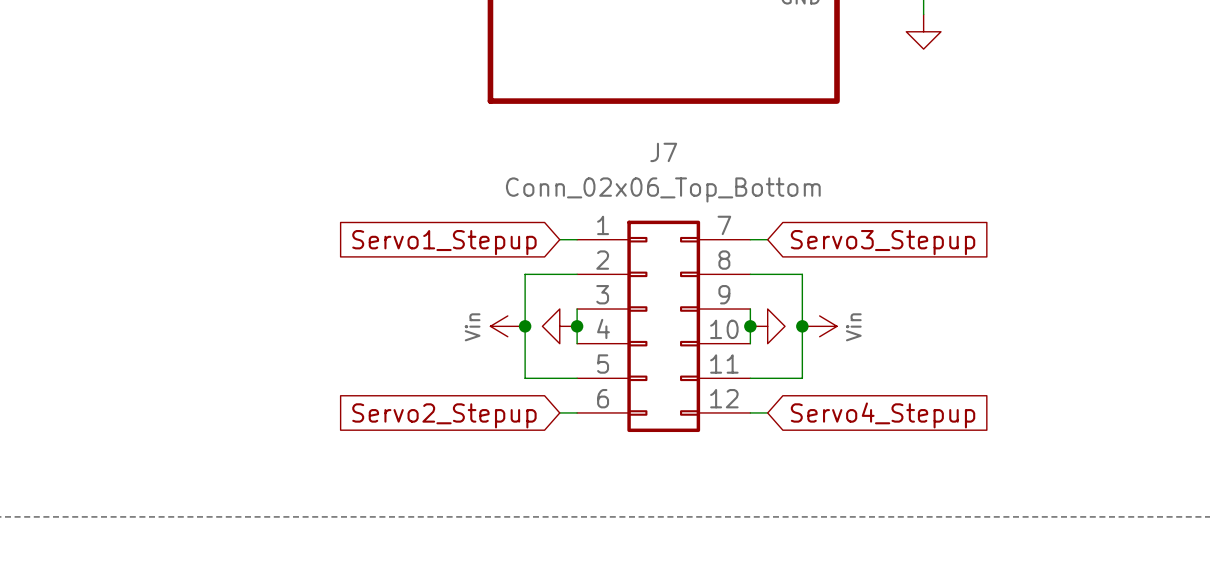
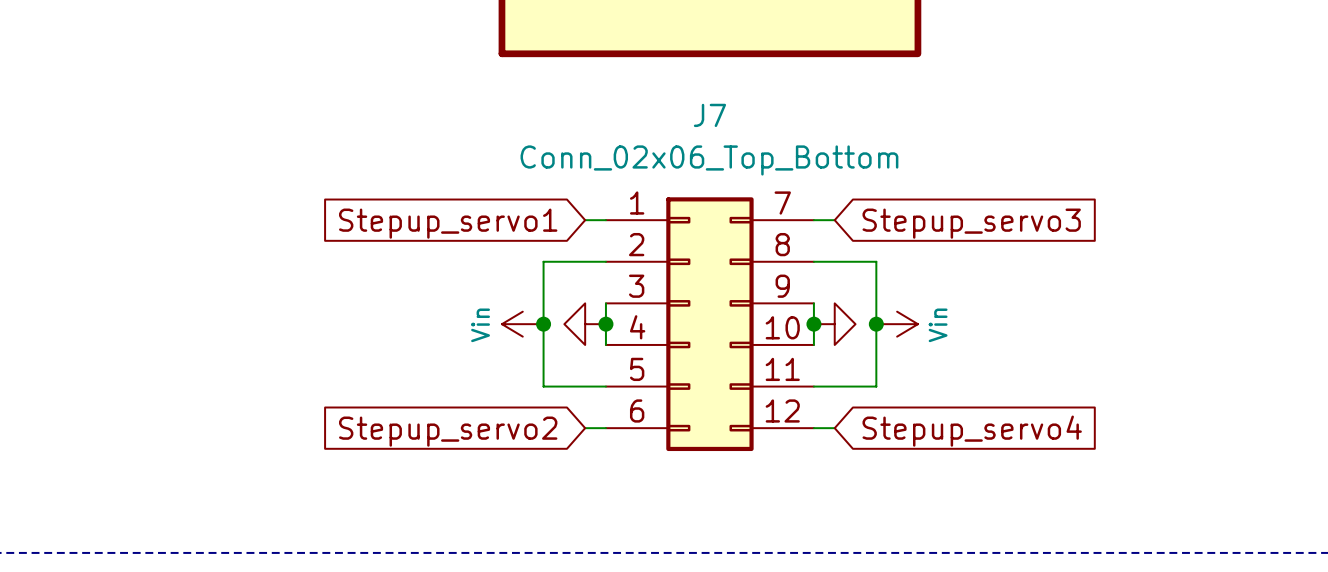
global label: Servo1_Stepup (444, 242) -> Stepup_servo1 (448, 223)
global label: Servo3_Stepup (883, 242) -> Stepup_servo3 (971, 223)
global label: Servo2_Stepup (444, 415) -> Stepup_servo2 (448, 431)
global label: Servo4_Stepup (883, 415) -> Stepup_servo4 (972, 431)

